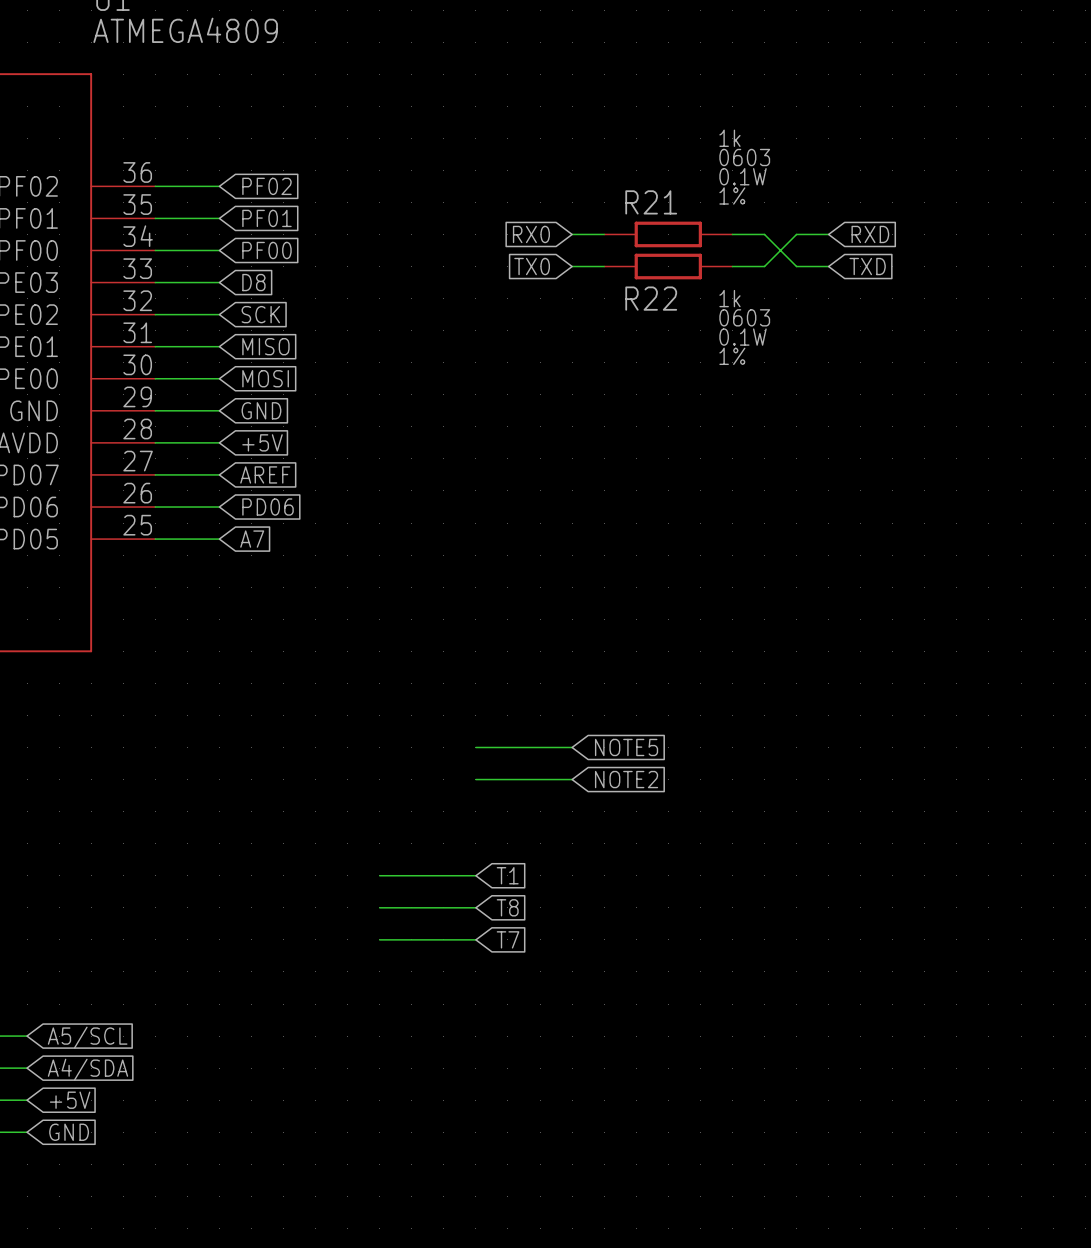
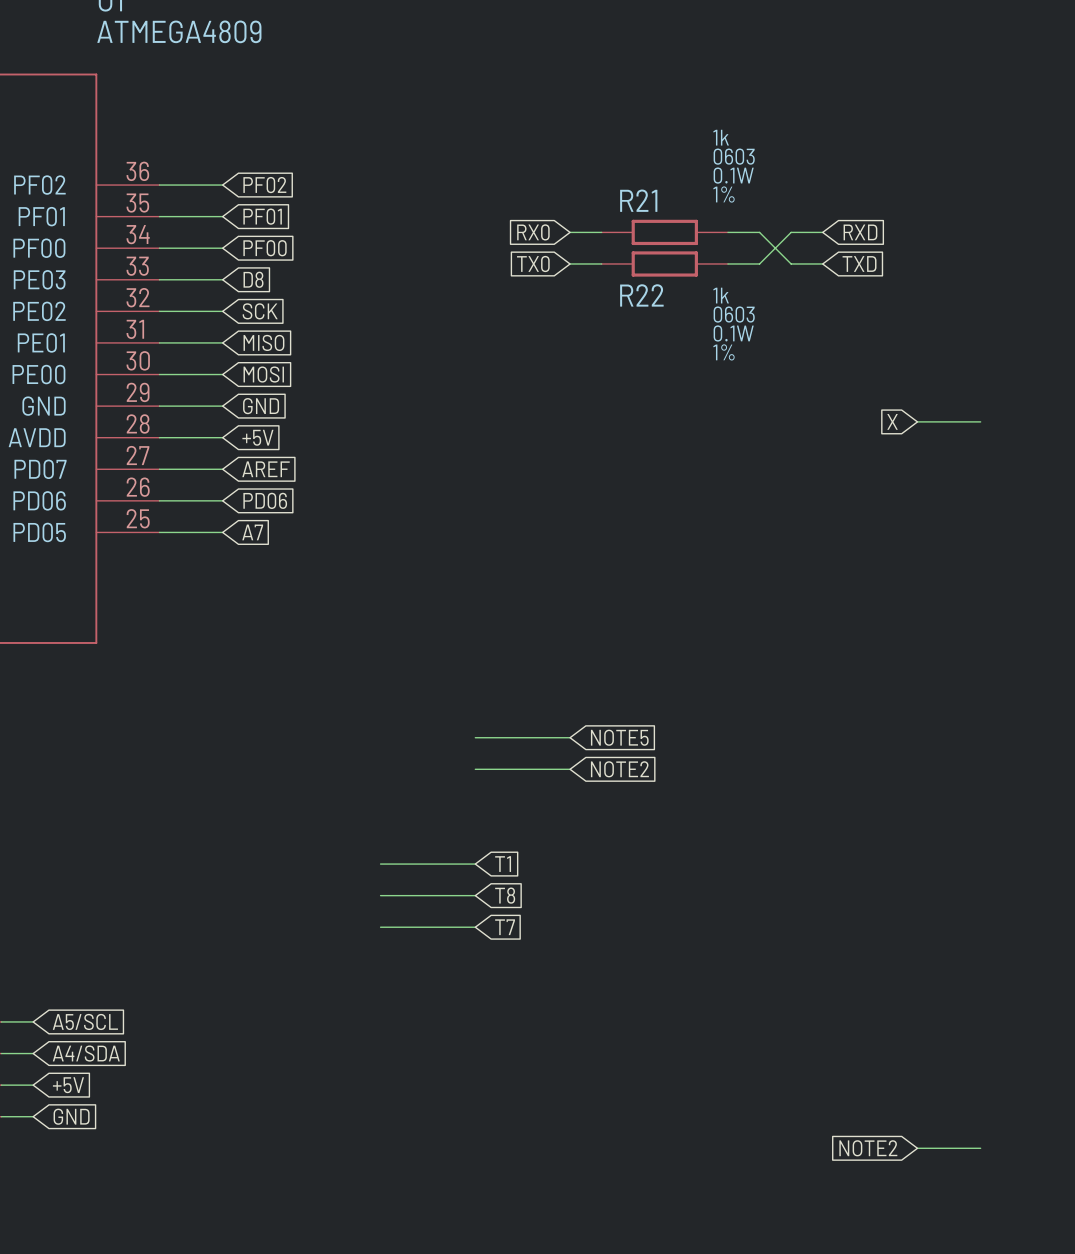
global label: none -> X (892, 421)
wire: none -> (917, 421) (980, 421)
global label: none -> NOTE2 (868, 1148)
wire: none -> (917, 1148) (980, 1148)

